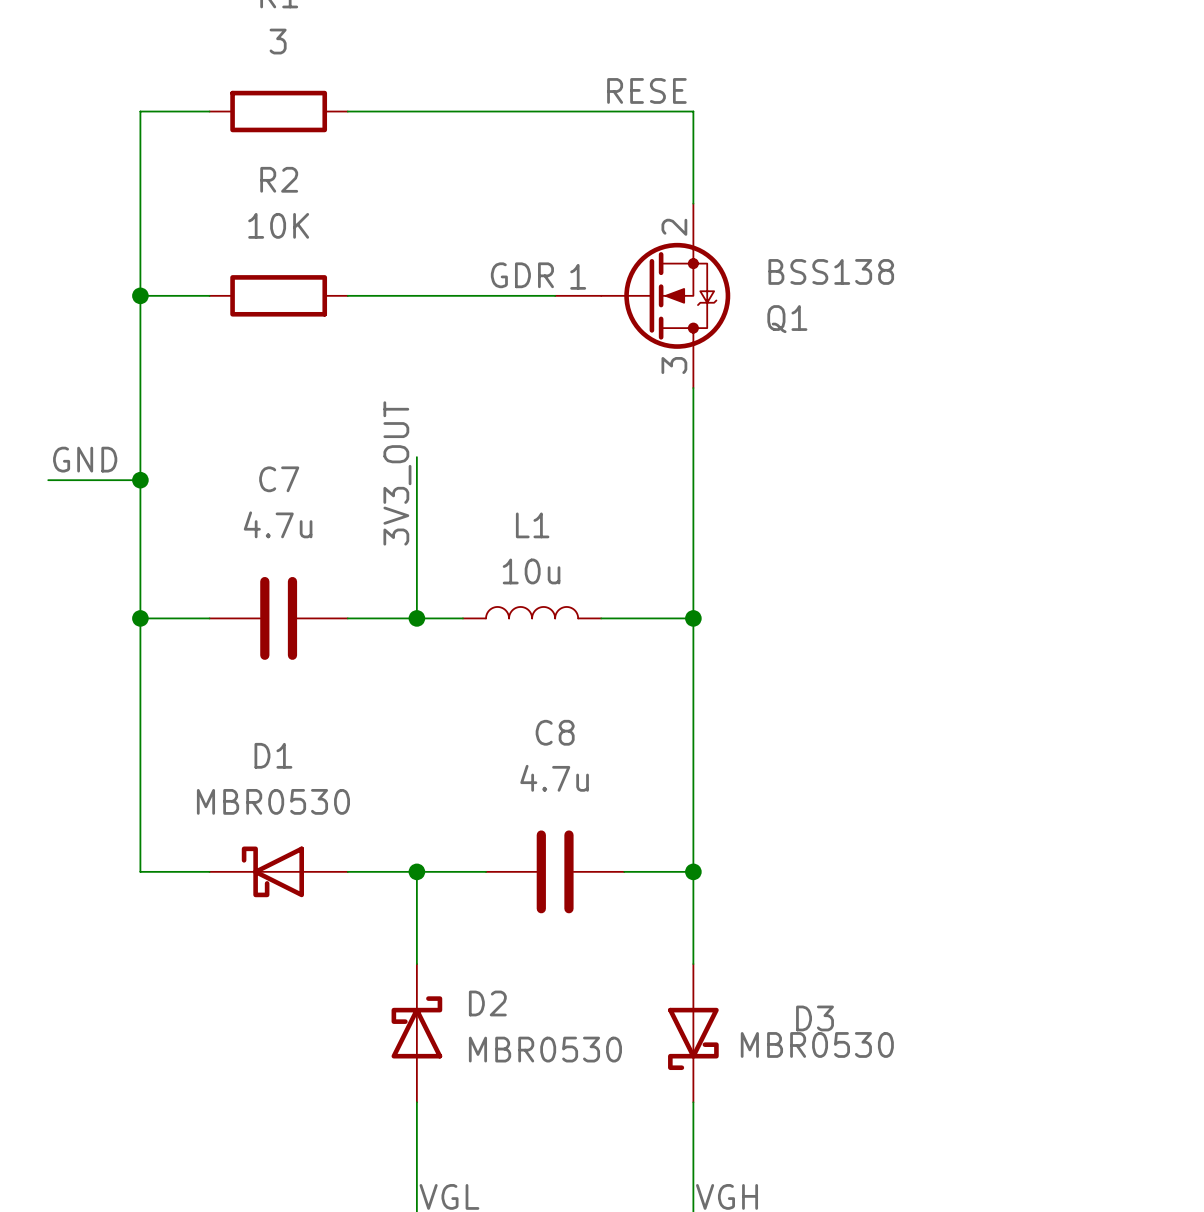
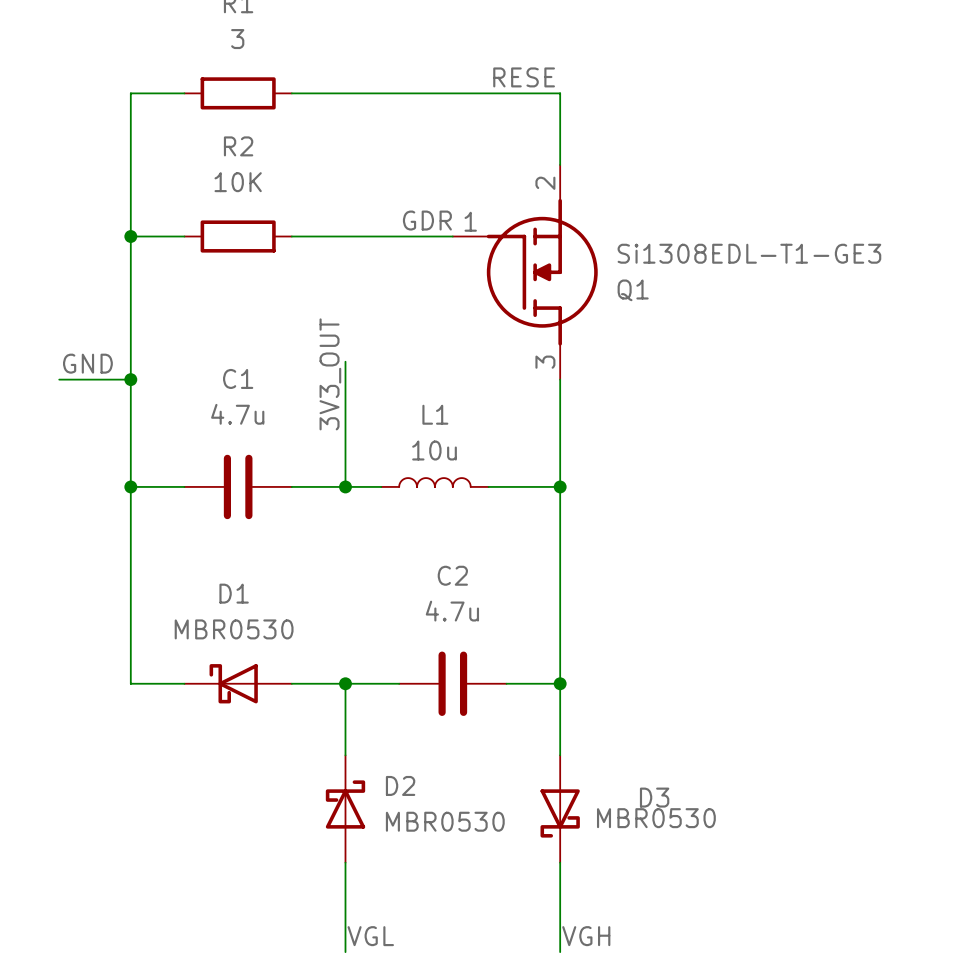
Q1 symbol: [555, 203, 731, 389] -> [452, 164, 598, 380]
Q1 value: BSS138 (831, 271) -> Si1308EDL-T1-GE3 (749, 253)
C7 name: C7 (279, 479) -> C1 (238, 378)
C8 name: C8 (555, 732) -> C2 (452, 575)

